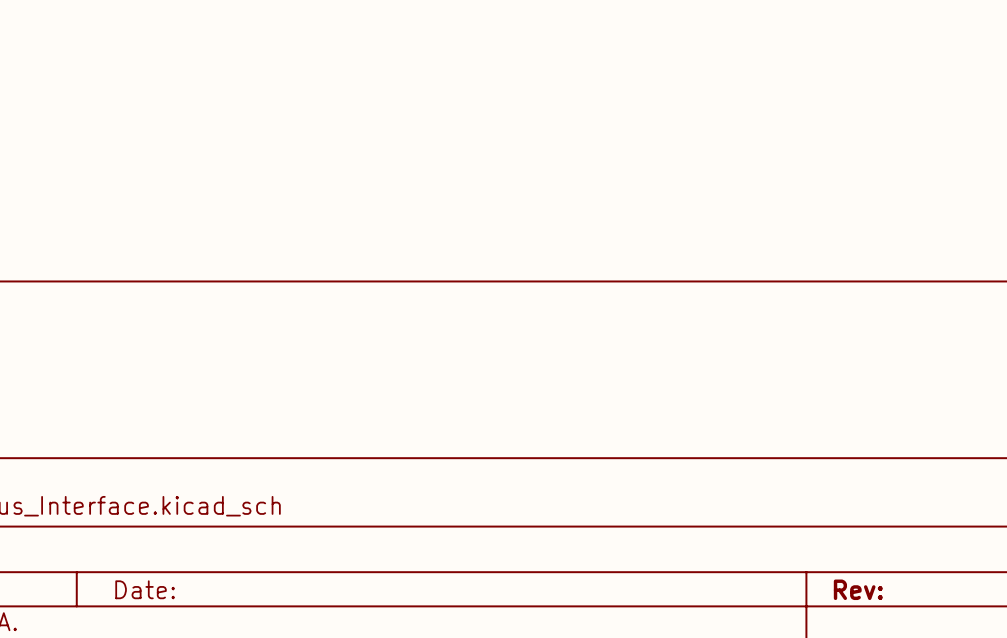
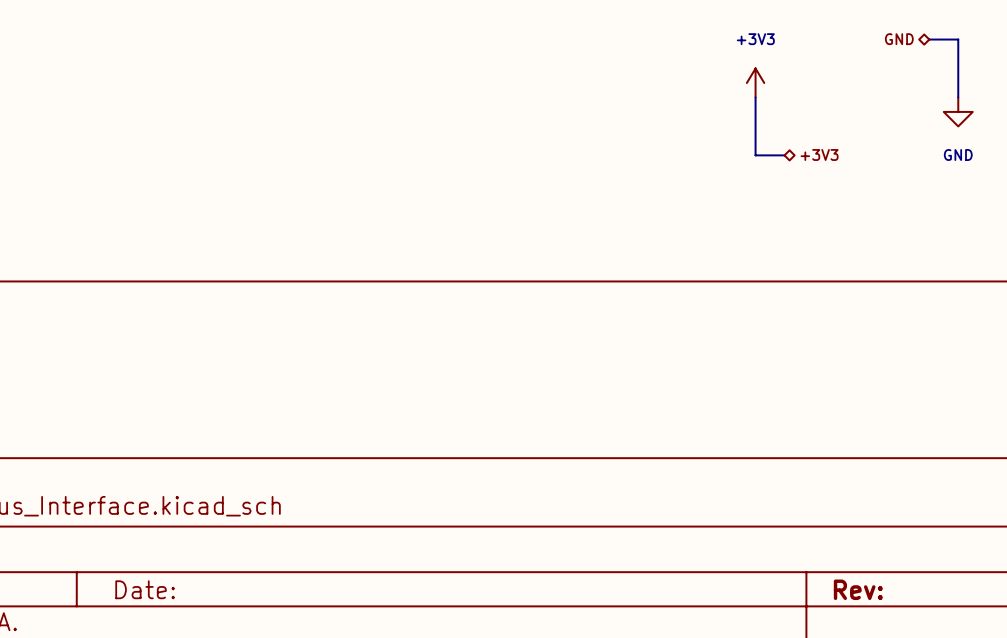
hierarchical label: none -> GND (899, 39)
wire: none -> (929, 39) (958, 39) (958, 97)
power symbol: none -> +3V3 (755, 82)
wire: none -> (755, 97) (755, 155) (784, 155)
power symbol: none -> GND (958, 111)
hierarchical label: none -> +3V3 (819, 154)

